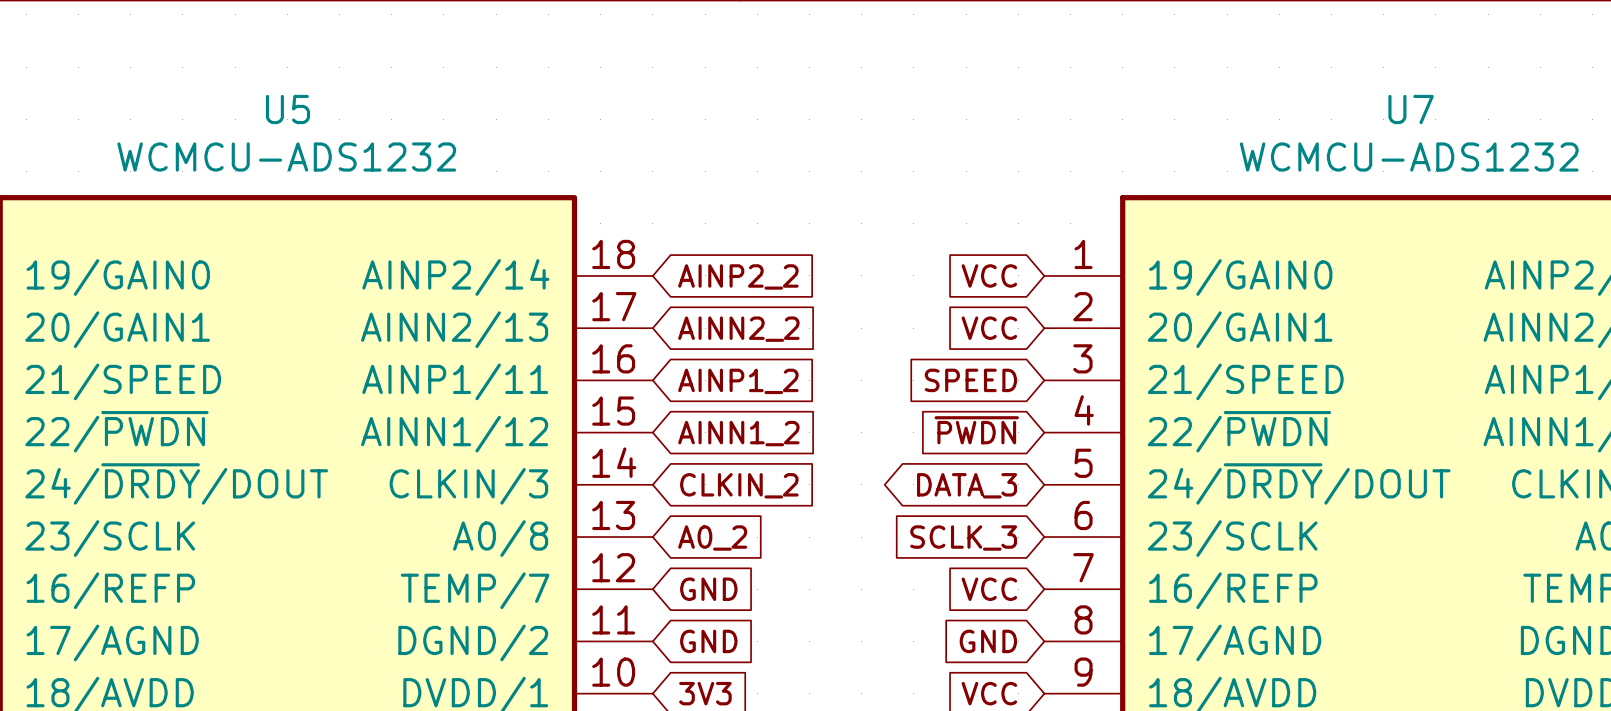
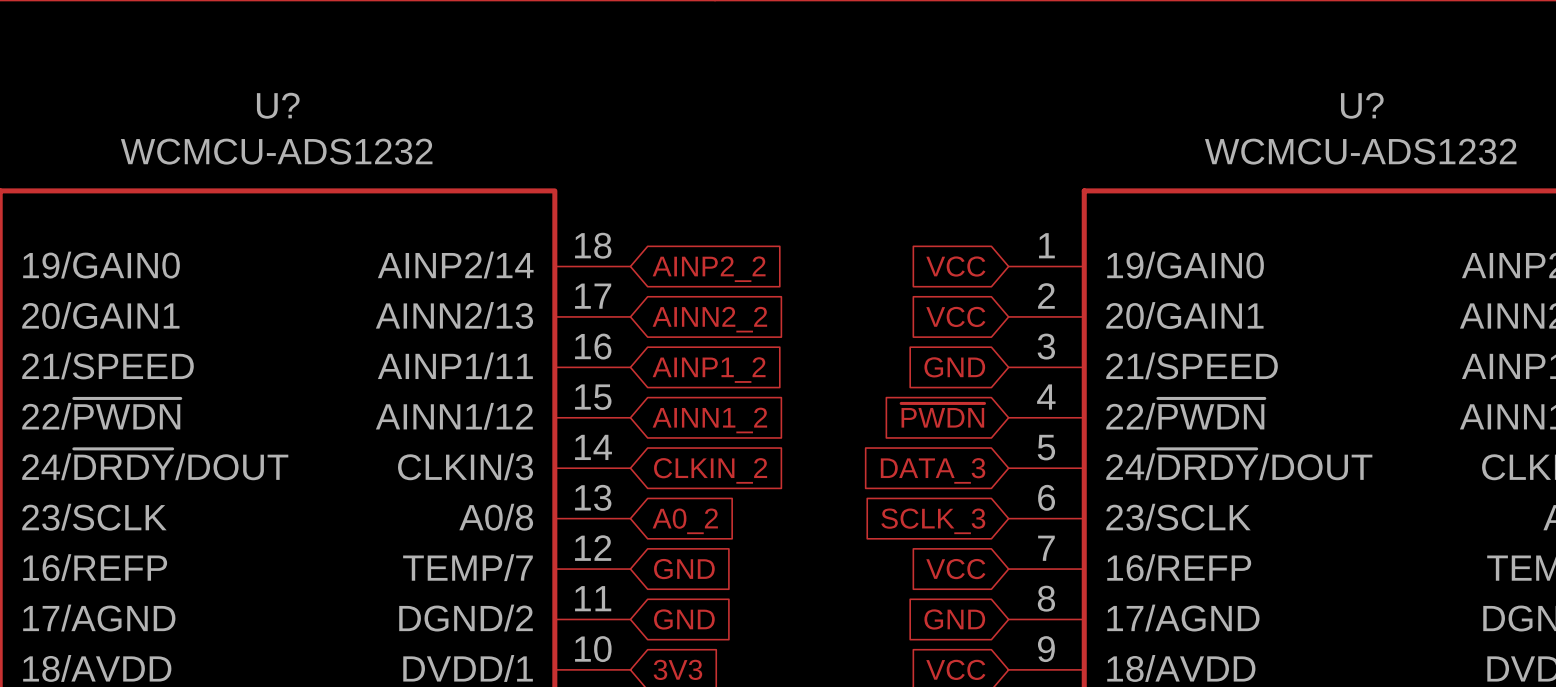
U5 name: U5 (287, 109) -> U? (278, 105)
U7 name: U7 (1411, 109) -> U? (1362, 105)
global label: SPEED (970, 380) -> GND (954, 367)
global label shape: bidirectional (967, 485) -> input (933, 470)

